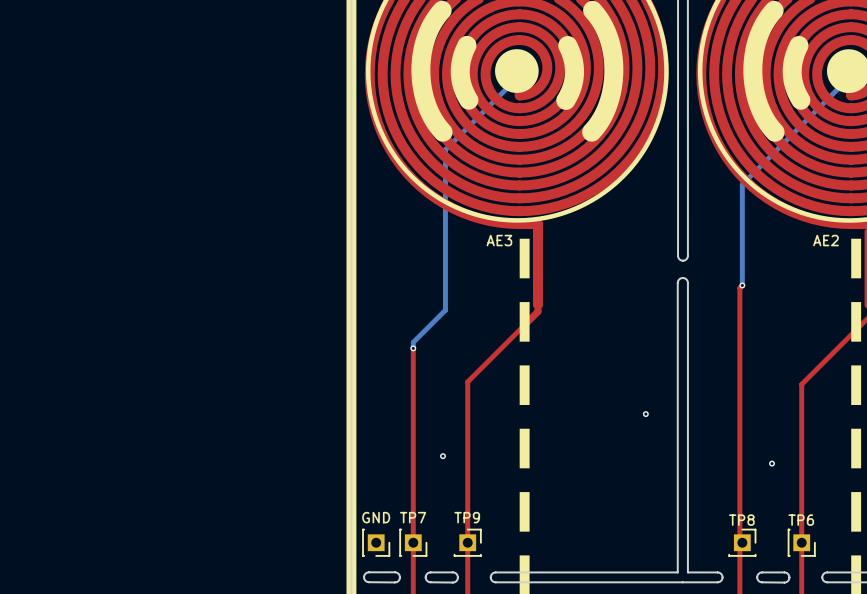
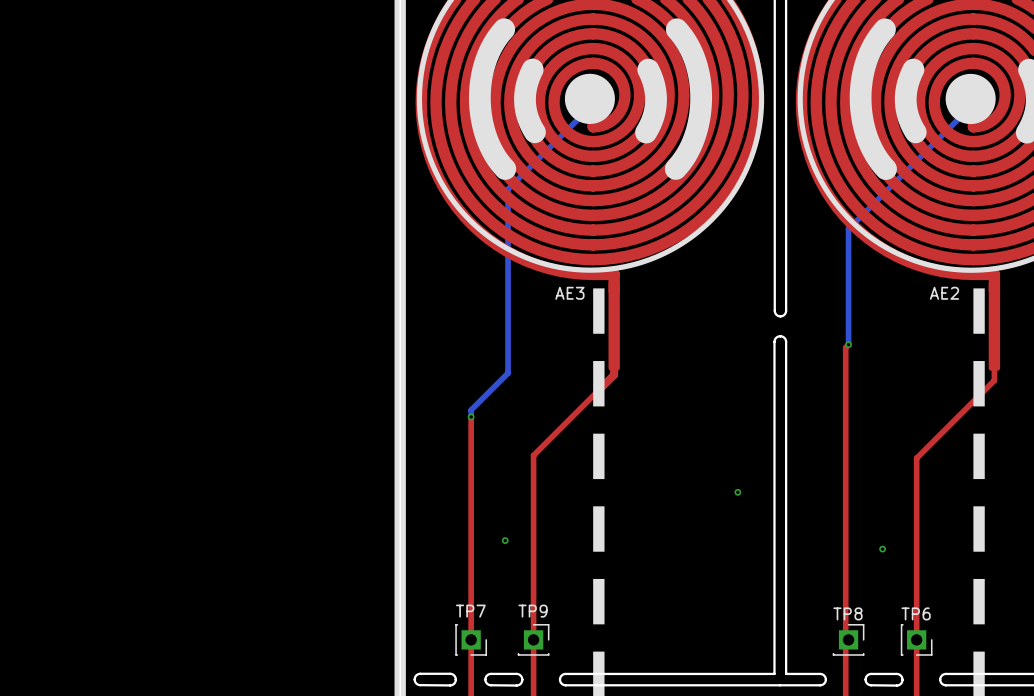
GND: (376, 542) -> none

